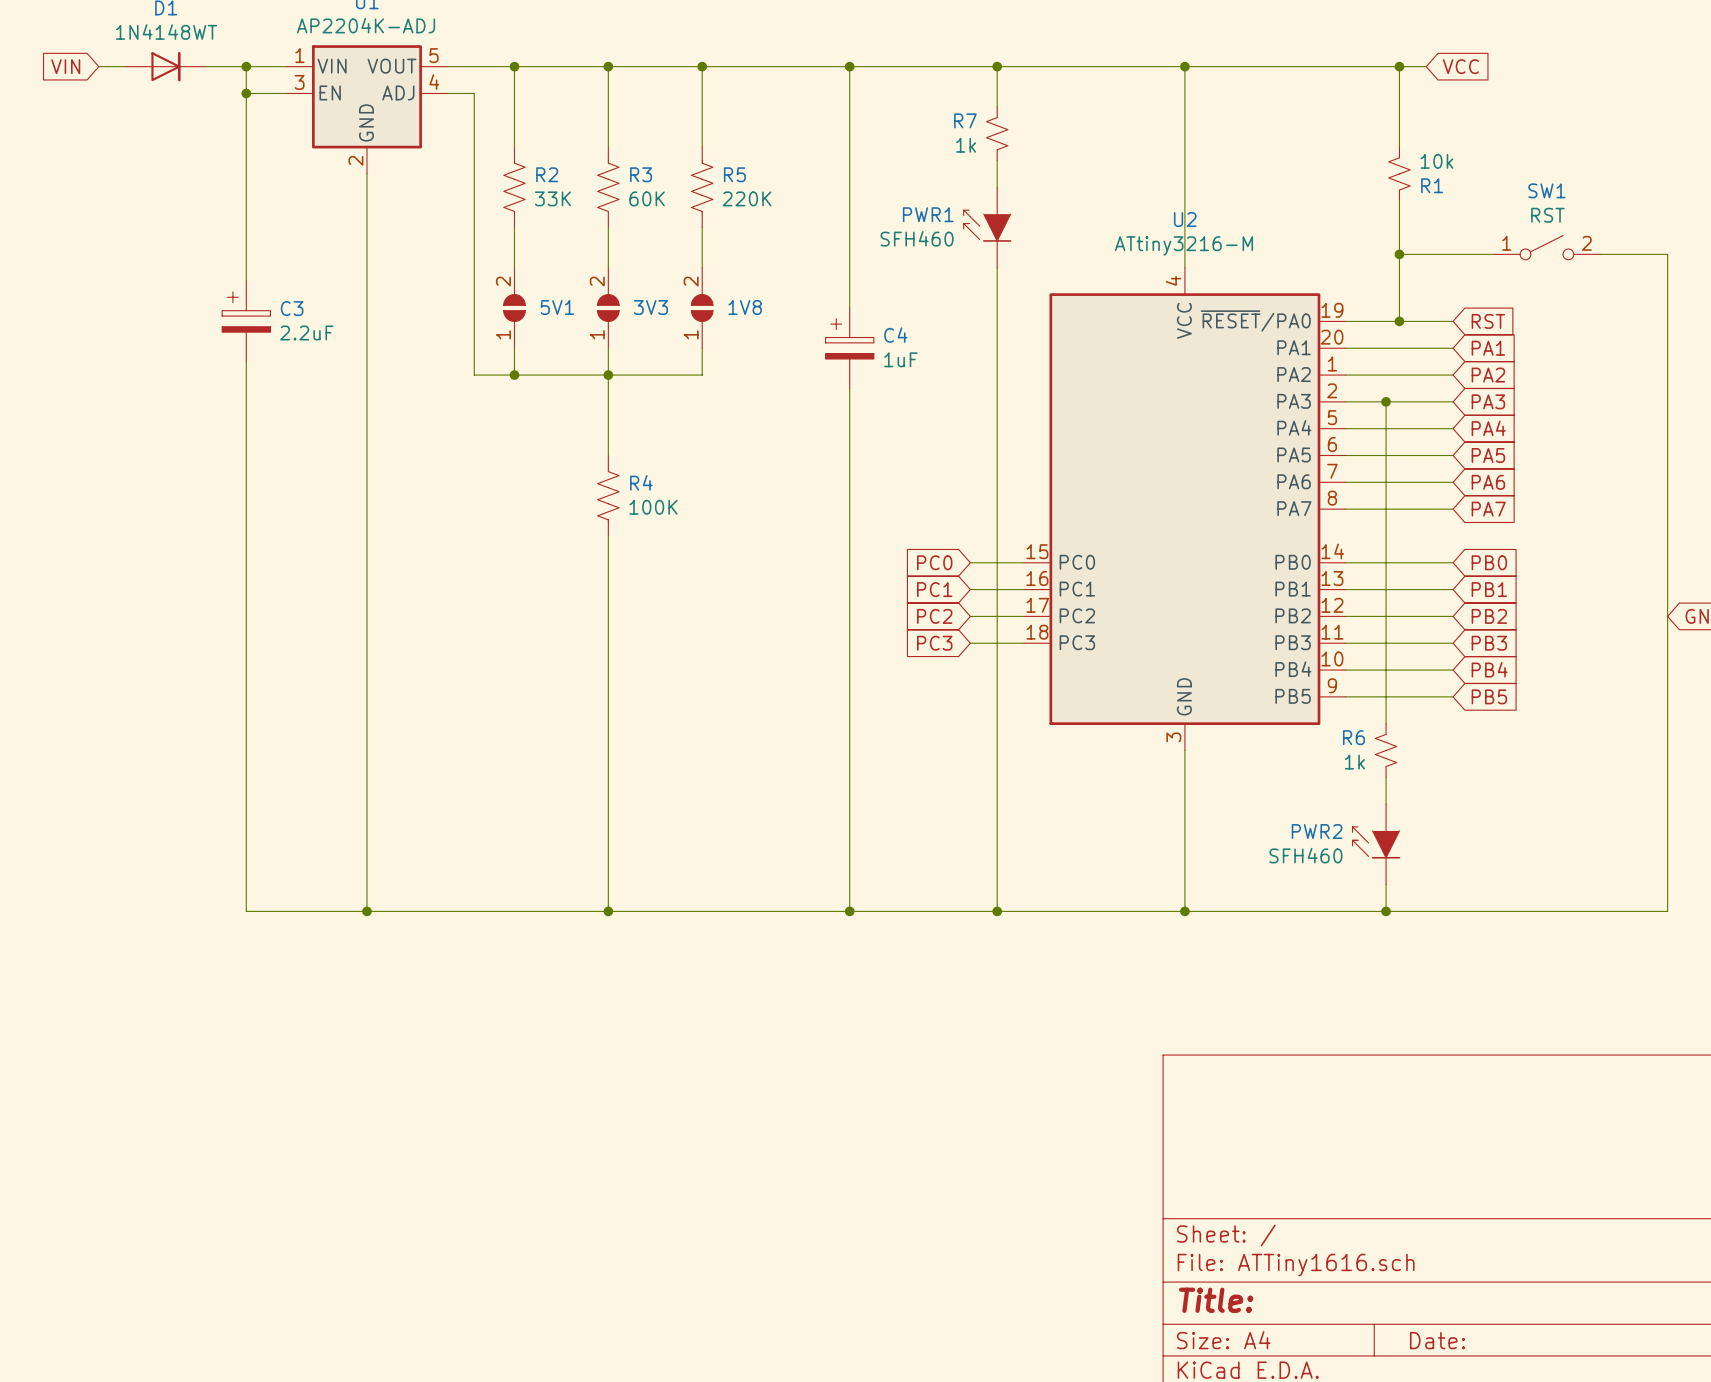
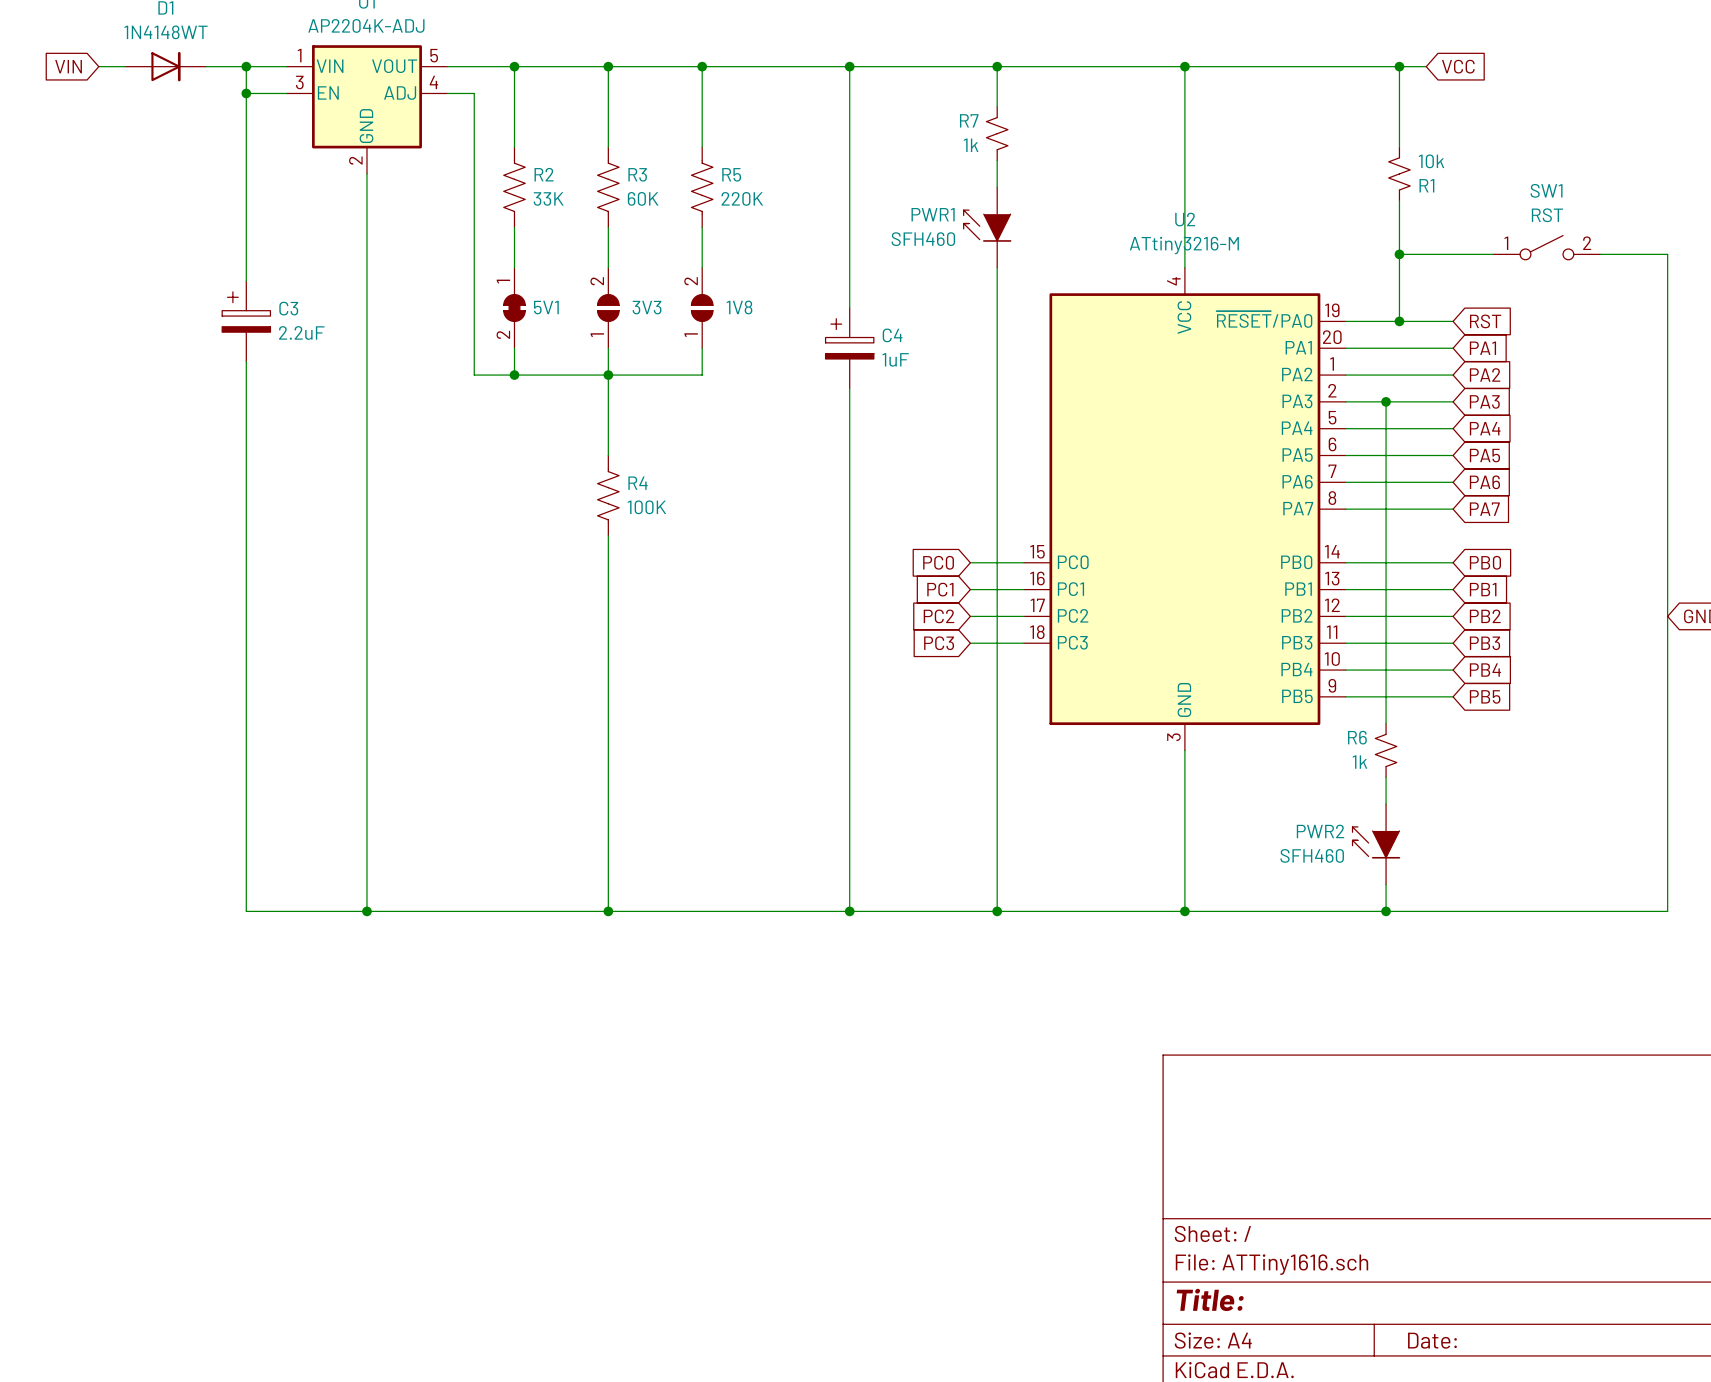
5V1 symbol: [503, 267, 526, 349] -> [503, 267, 526, 349]

